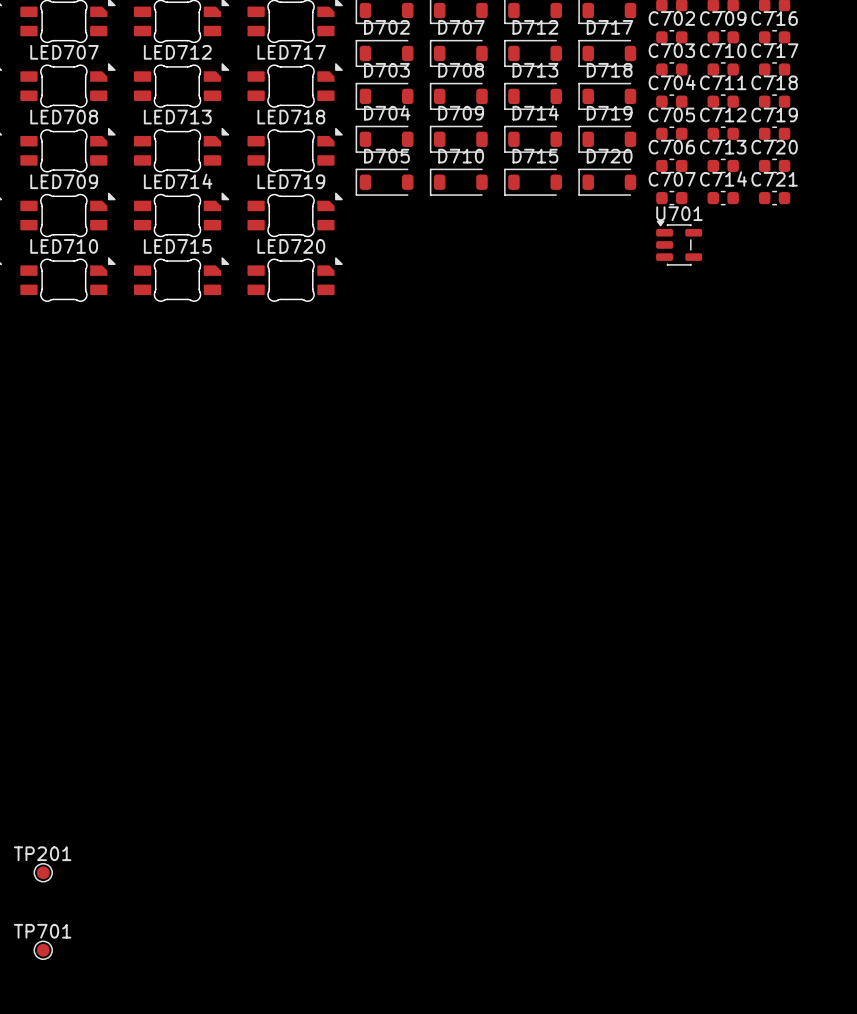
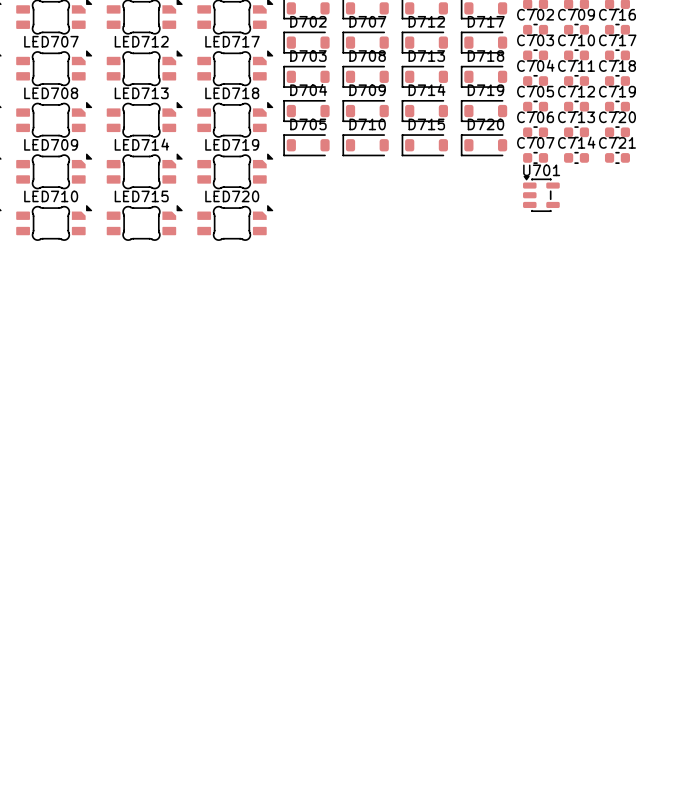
TP201: (43, 872) -> none
TP701: (43, 950) -> none

